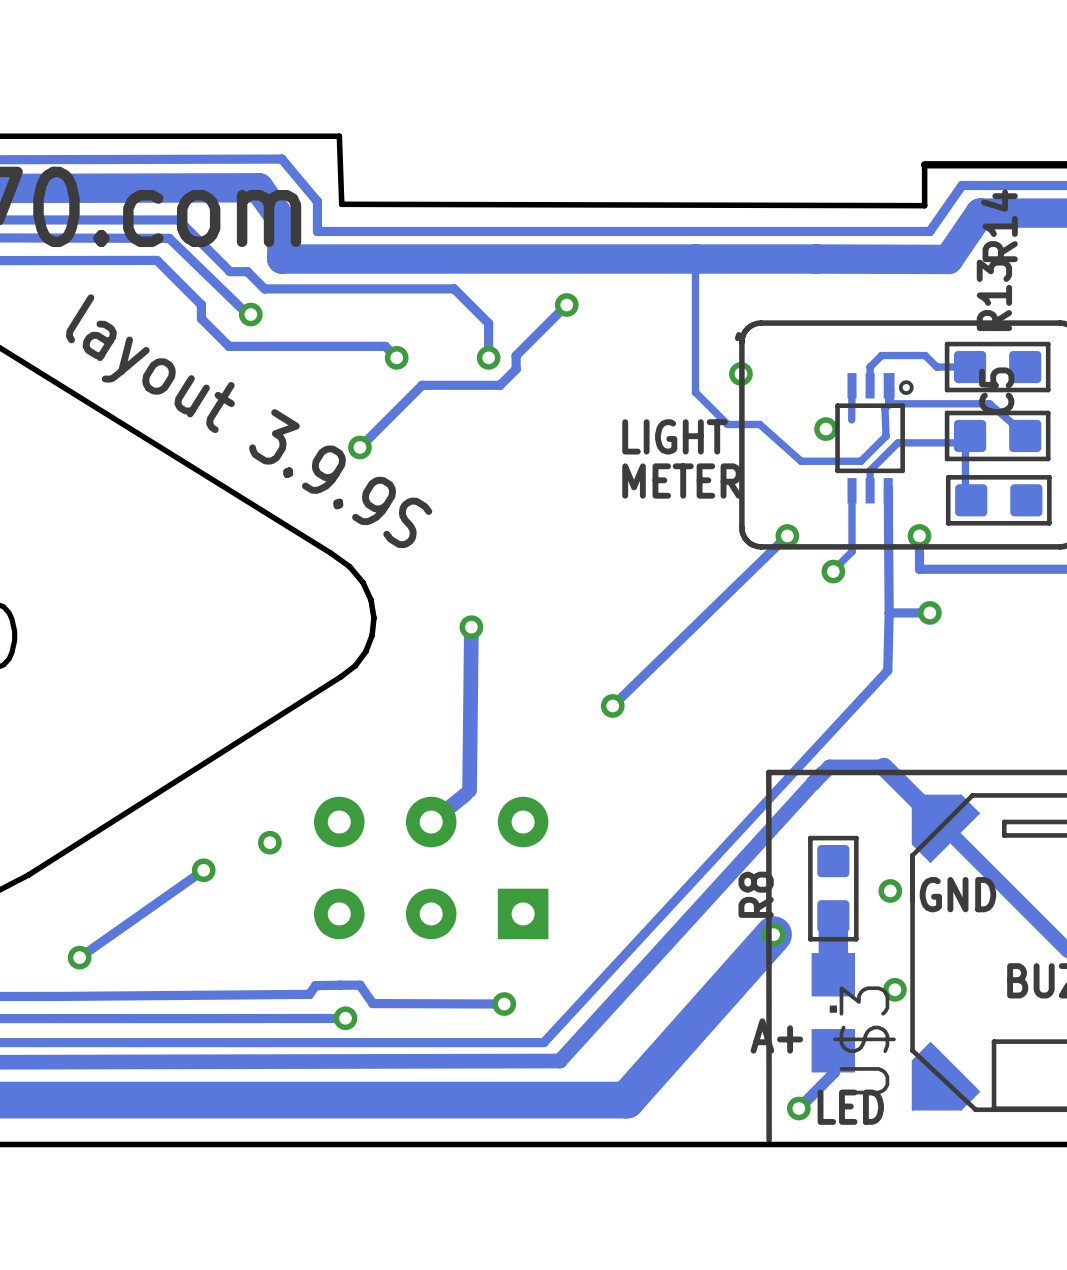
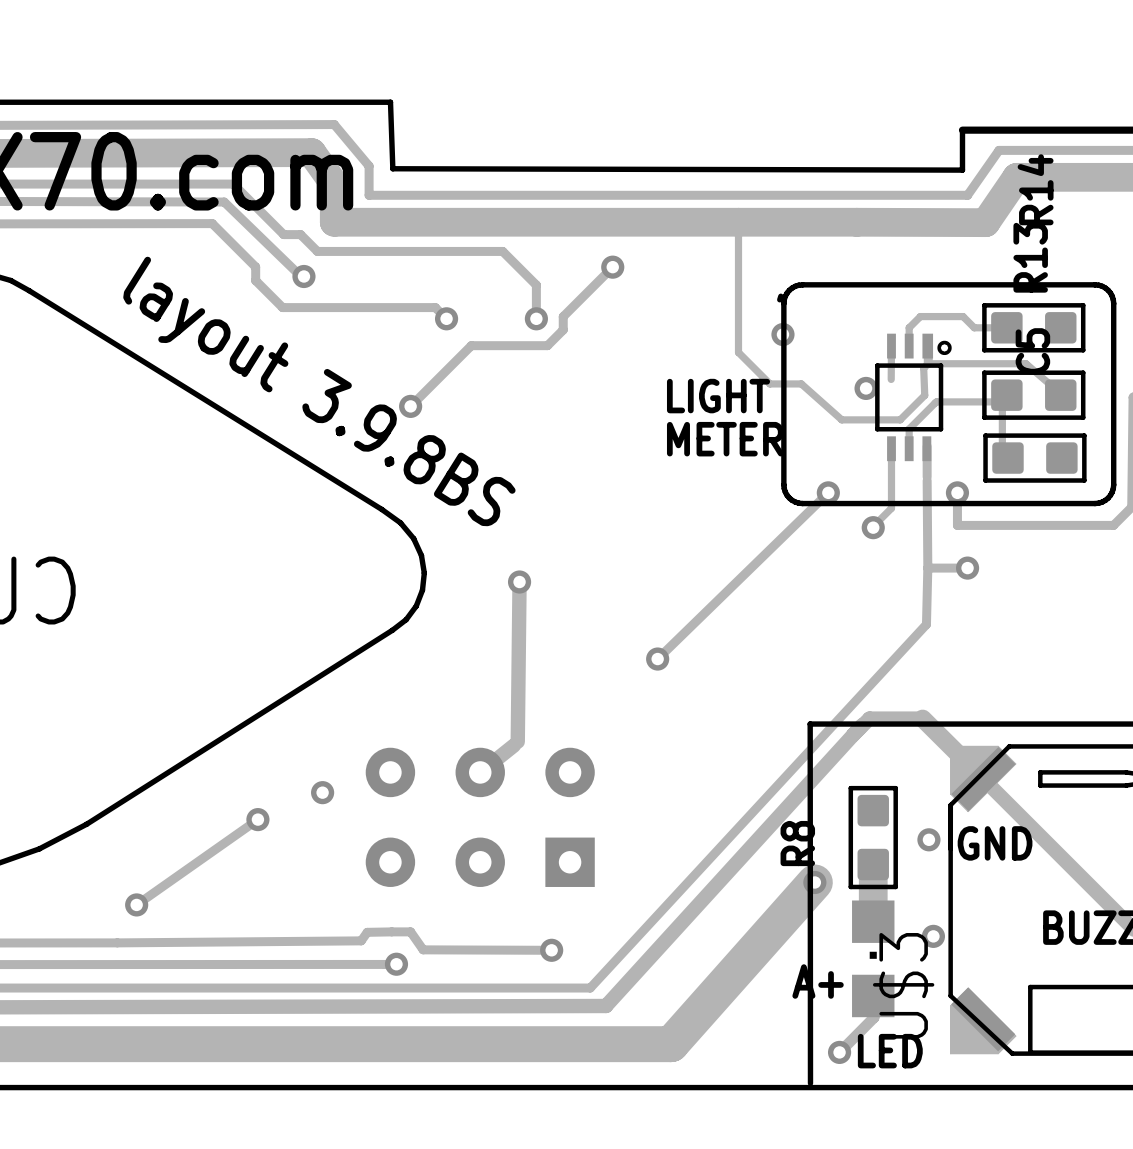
text: layout 3.9.9S (249, 421) -> layout 3.9.8BS (319, 391)

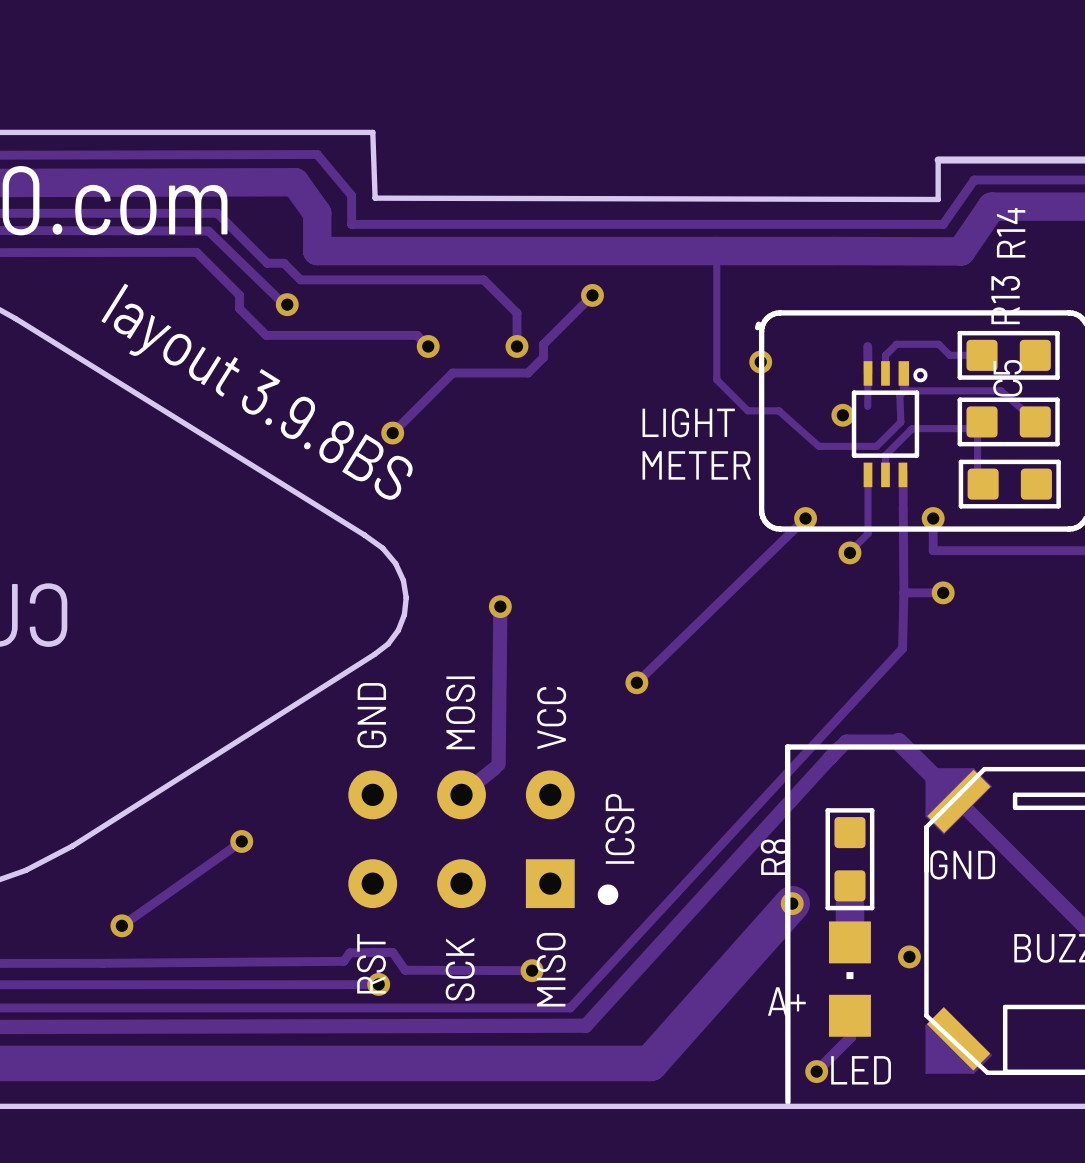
track: none -> (867, 346) (868, 373)
text: none -> MOSI (460, 712)
text: none -> GND (371, 715)
text: none -> VCC (551, 718)
via: (322, 792) -> none
text: none -> ICSP (620, 828)
via: (928, 839) -> none
drawing: none -> [597, 884, 619, 906]
text: none -> RST (371, 963)
text: none -> SCK (460, 969)
text: none -> MISO (551, 969)
U$3 name: U$3 (903, 985) -> none

